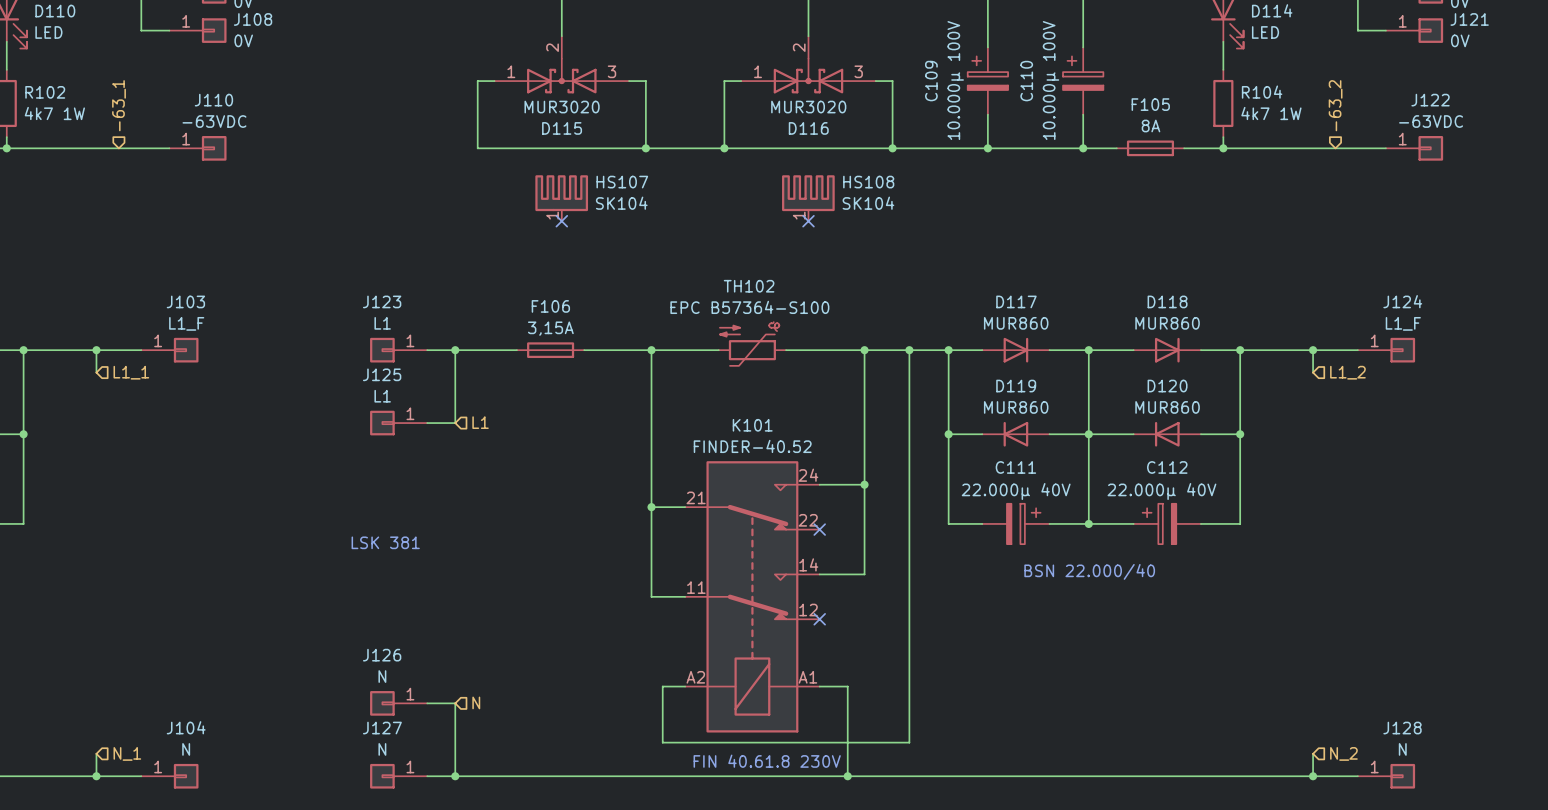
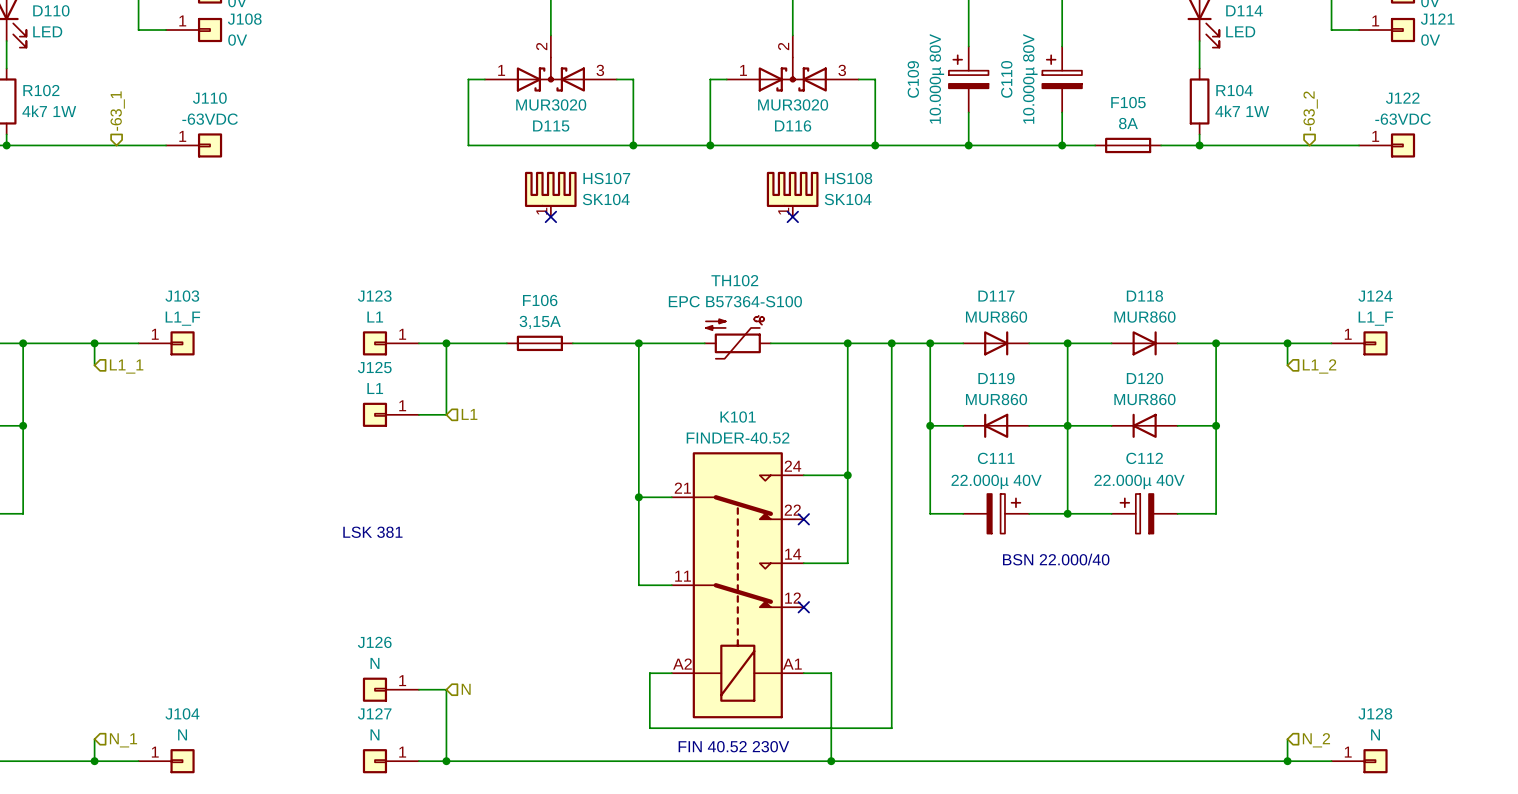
C109 value: 10.000µ 100V (955, 80) -> 10.000µ 80V (936, 78)
C110 value: 10.000µ 100V (1051, 80) -> 10.000µ 80V (1030, 78)
text: FIN 40.61.8 230V (767, 761) -> FIN 40.52 230V (733, 746)

